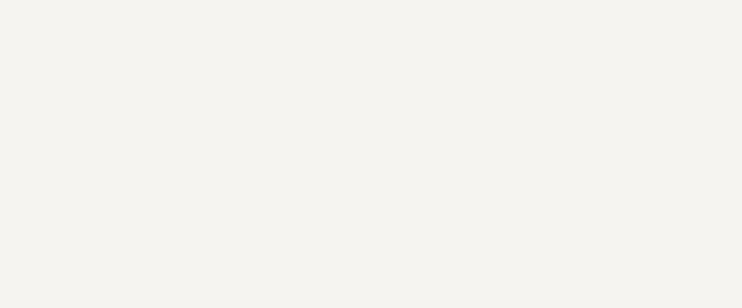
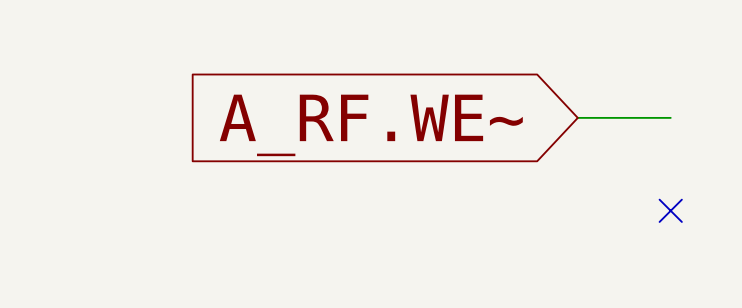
wire: none -> (577, 117) (670, 117)
global label: none -> A_RF.WE~ (371, 125)
no-connect mark: none -> (670, 210)

